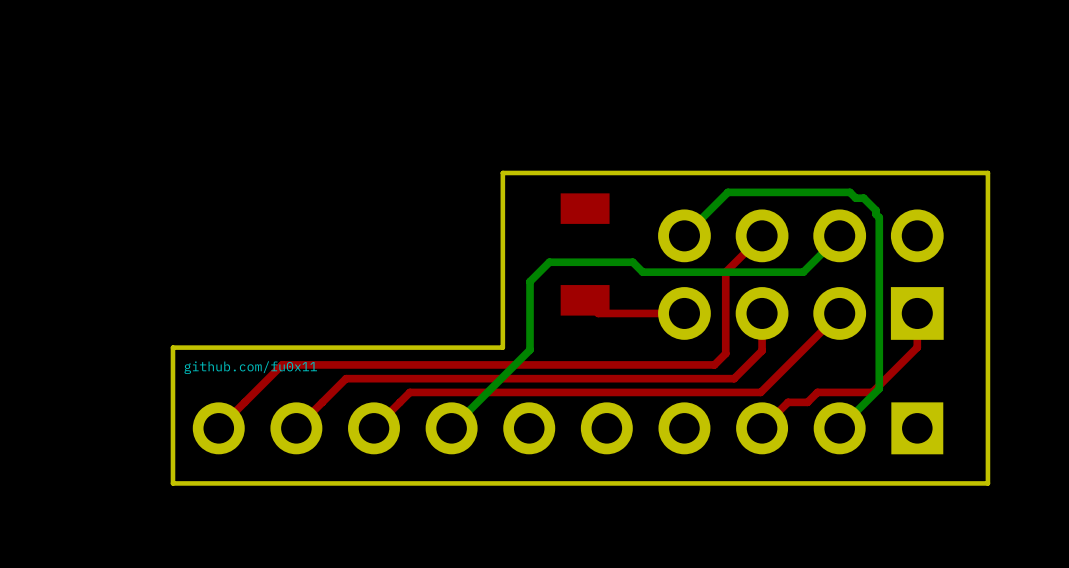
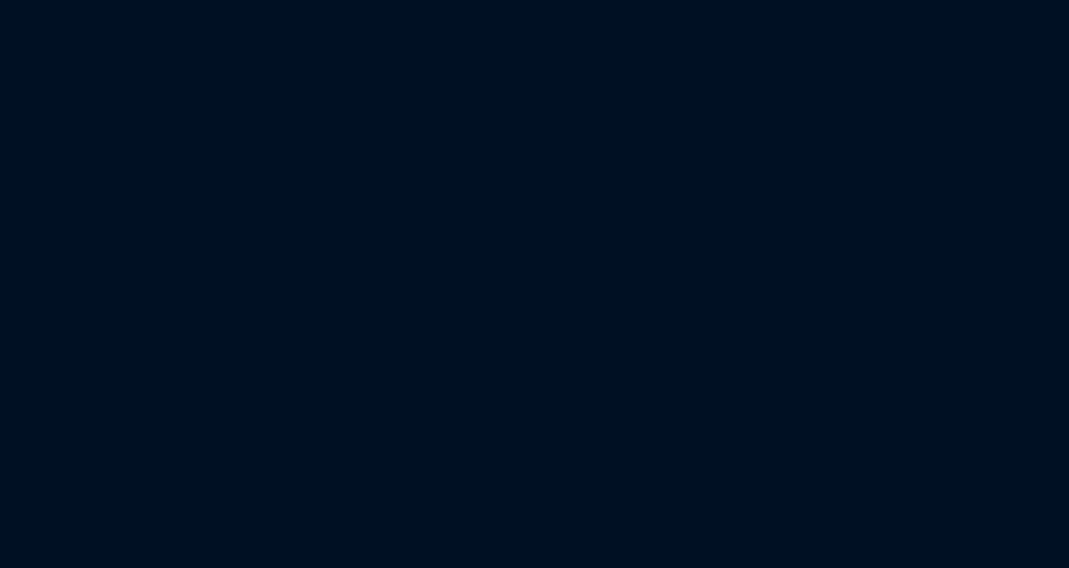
board edge: (987, 172) (987, 483) (172, 483) (172, 347) (502, 347) (502, 172) (987, 172) -> none
bottom track: (684, 235) (727, 192) (849, 192) (855, 198) (863, 198) (876, 210) (876, 214) (879, 217) (879, 388) (839, 428) -> none
top track: (762, 235) (725, 272) (725, 353) (714, 364) (282, 364) (218, 428) -> none
bottom track: (839, 235) (803, 272) (642, 272) (632, 262) (549, 262) (530, 281) (530, 349) (451, 428) -> none
part: (585, 254) -> none
part: (800, 274) -> none
top track: (585, 300) (598, 313) (684, 313) -> none
top track: (762, 313) (762, 350) (734, 378) (346, 378) (296, 428) -> none
top track: (839, 313) (760, 392) (409, 392) (374, 428) -> none
top track: (917, 313) (917, 347) (872, 392) (817, 392) (807, 402) (788, 402) (762, 428) -> none
text: github.com/fu0x11 (250, 367) -> none
part: (568, 428) -> none

